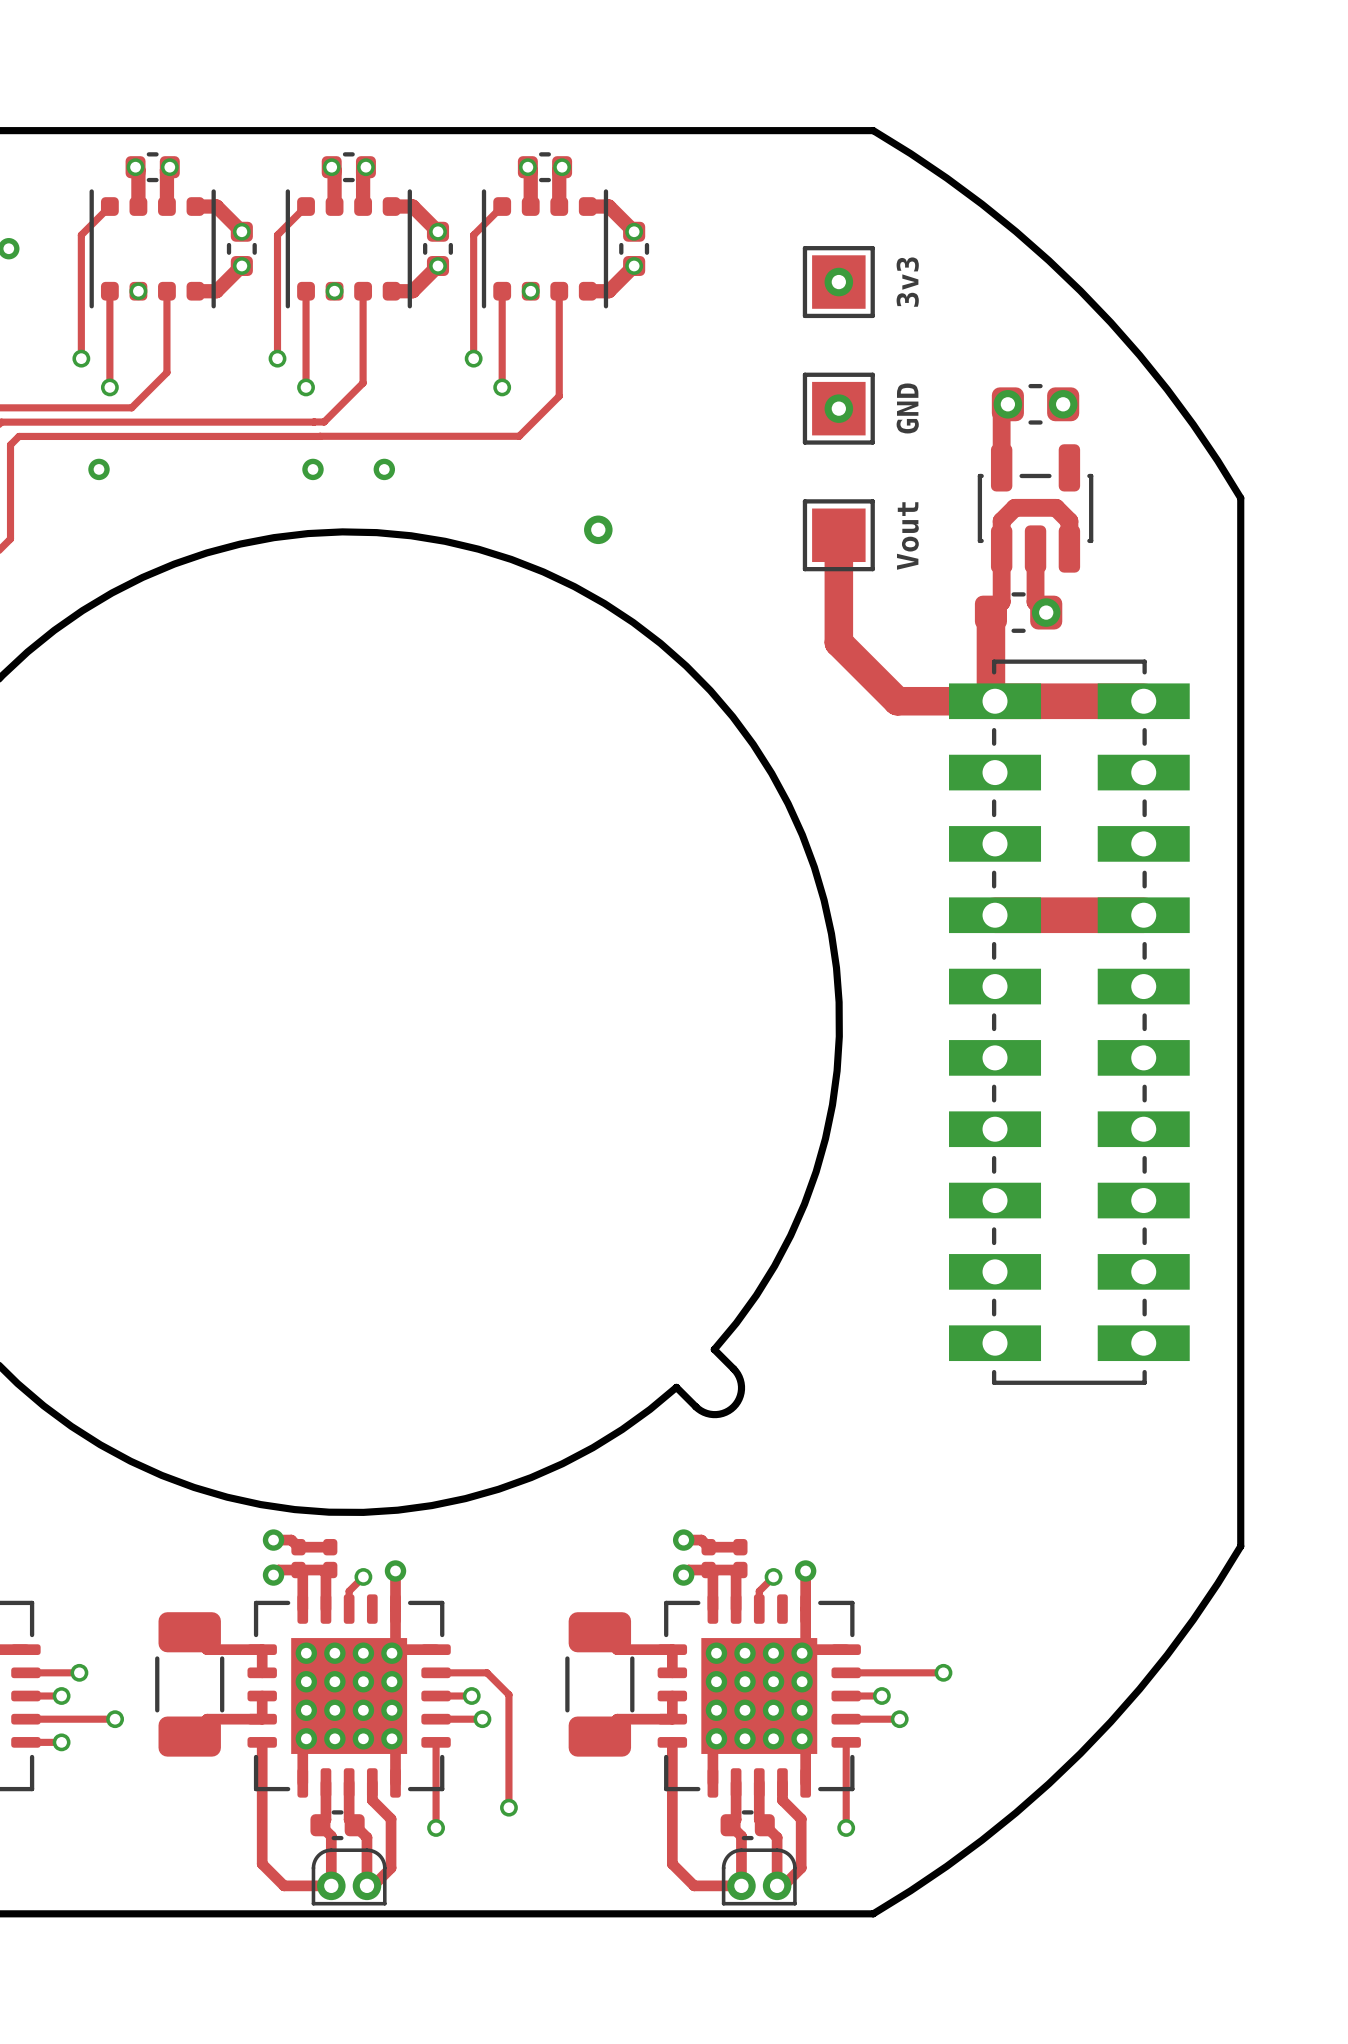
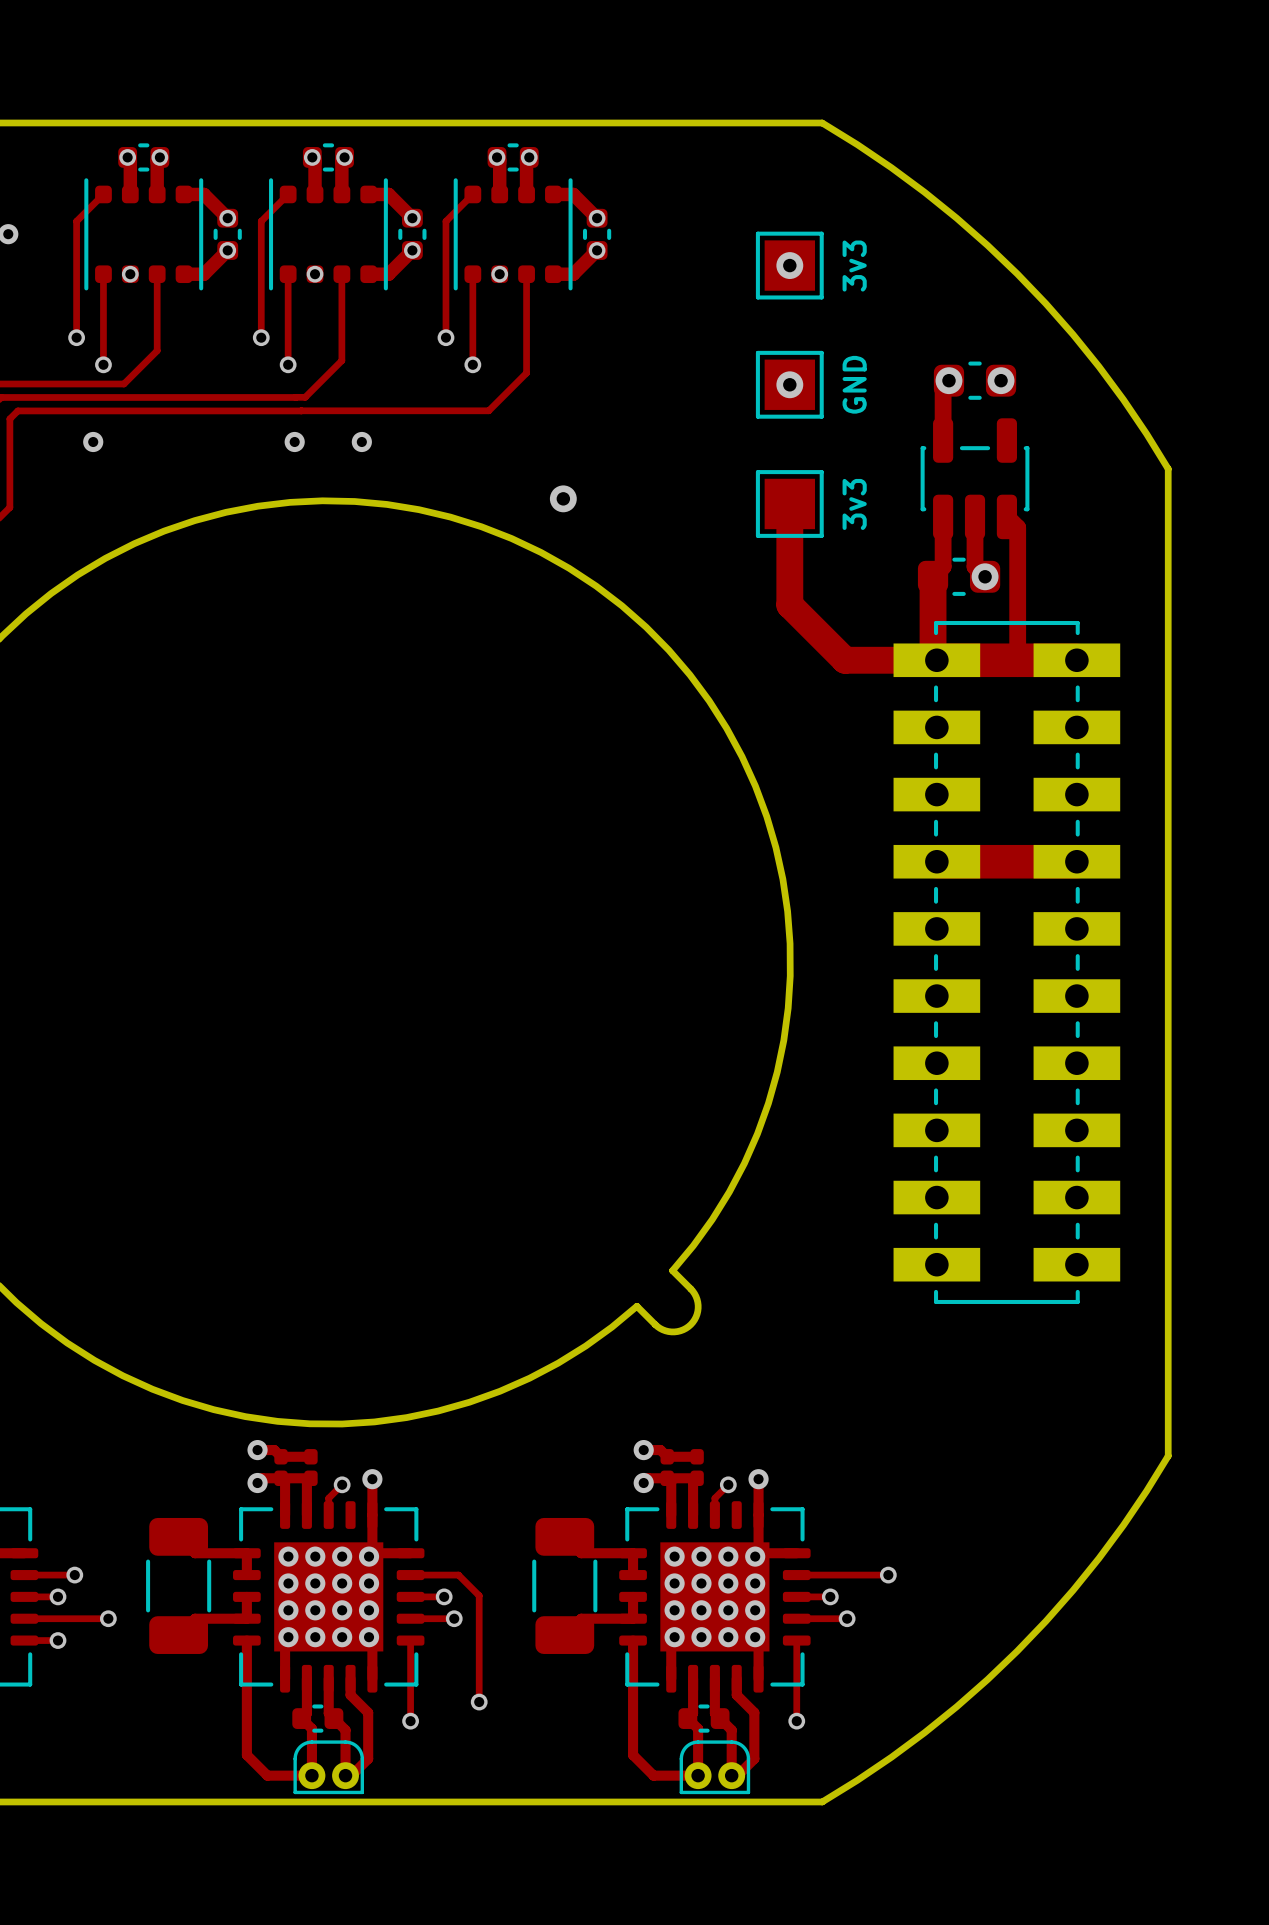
text: Vout (907, 536) -> 3v3 (854, 504)
track: (1001, 549) (1001, 521) (1014, 507) (1056, 507) (1069, 521) (1069, 549) -> (1017, 660) (1017, 527) (1006, 516)

